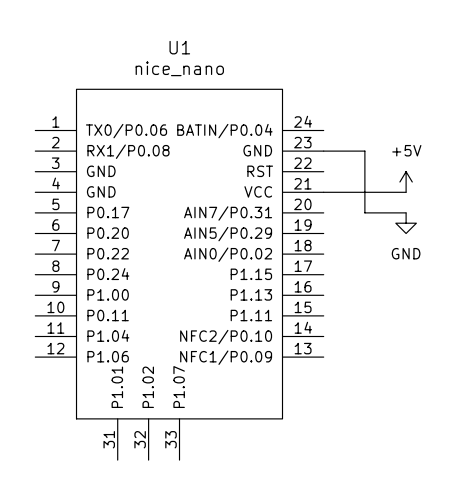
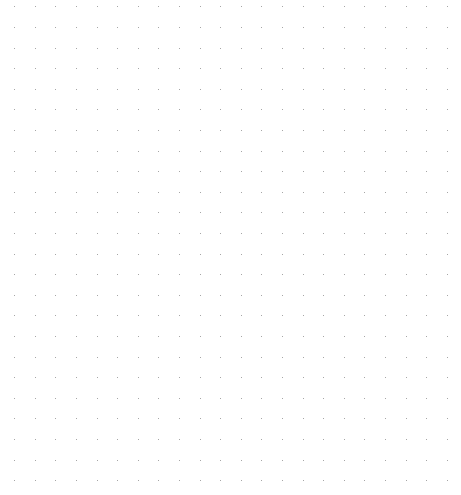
wire: (323, 151) (364, 151) (364, 212) (406, 212) -> none
power symbol: +5V (406, 182) -> none
wire: (323, 192) (406, 192) -> none
power symbol: GND (406, 223) -> none
U1: nice_nano (179, 274) -> none

